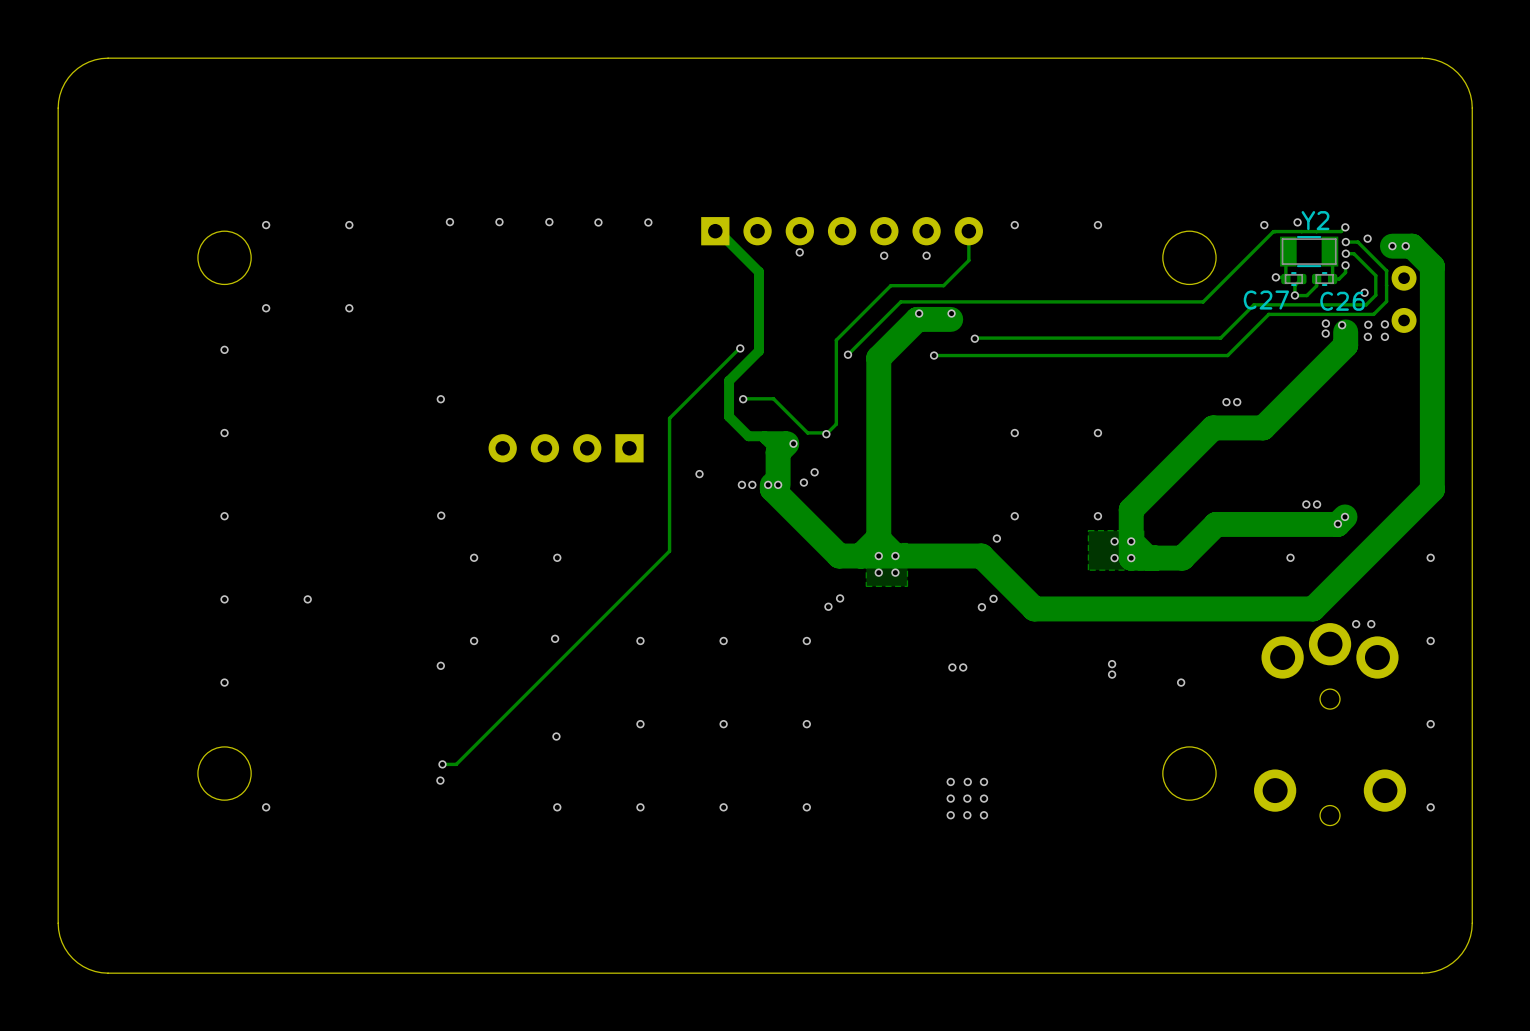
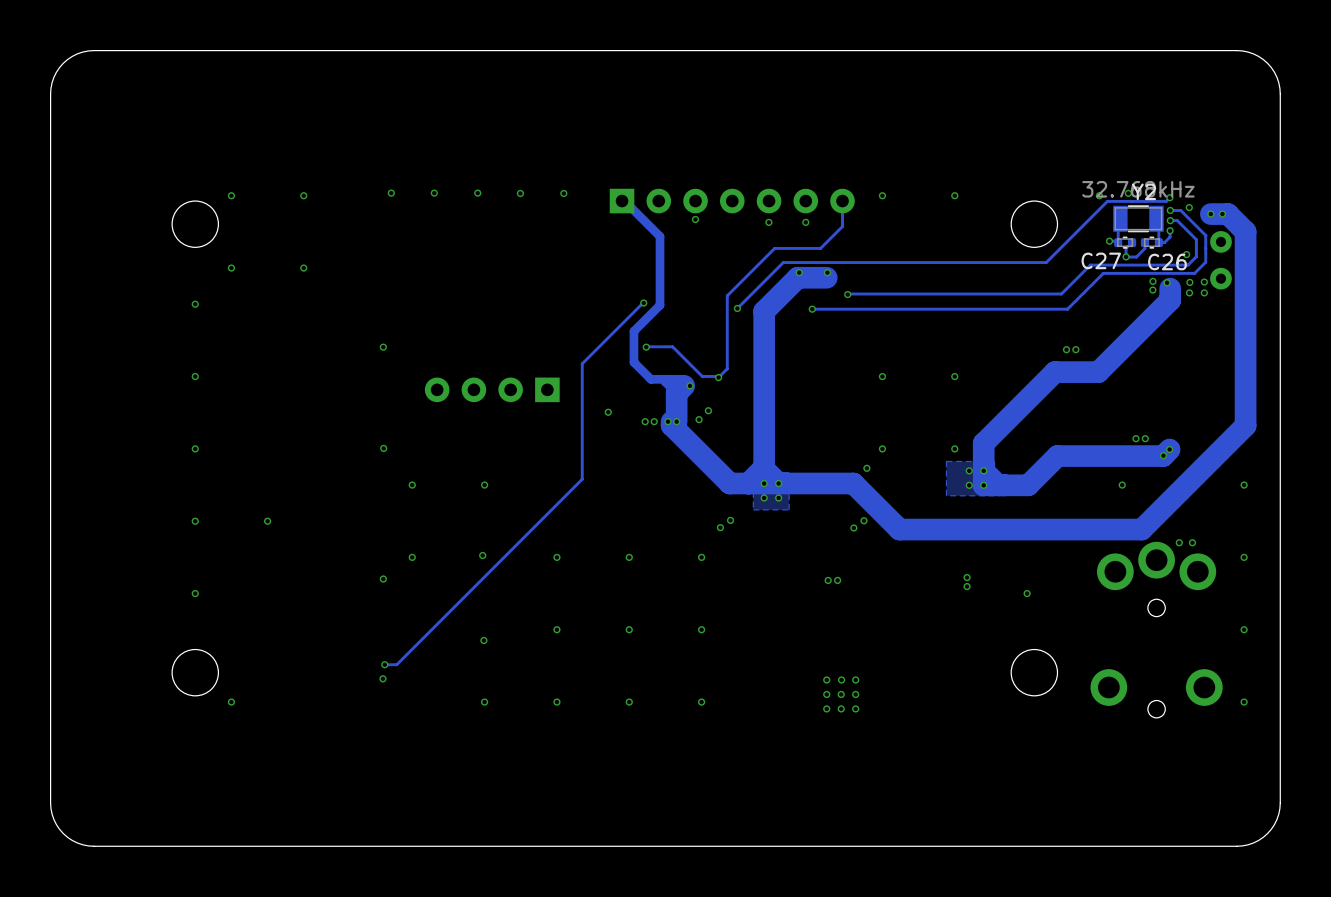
Y2 value: none -> 32.768kHz (1138, 189)

